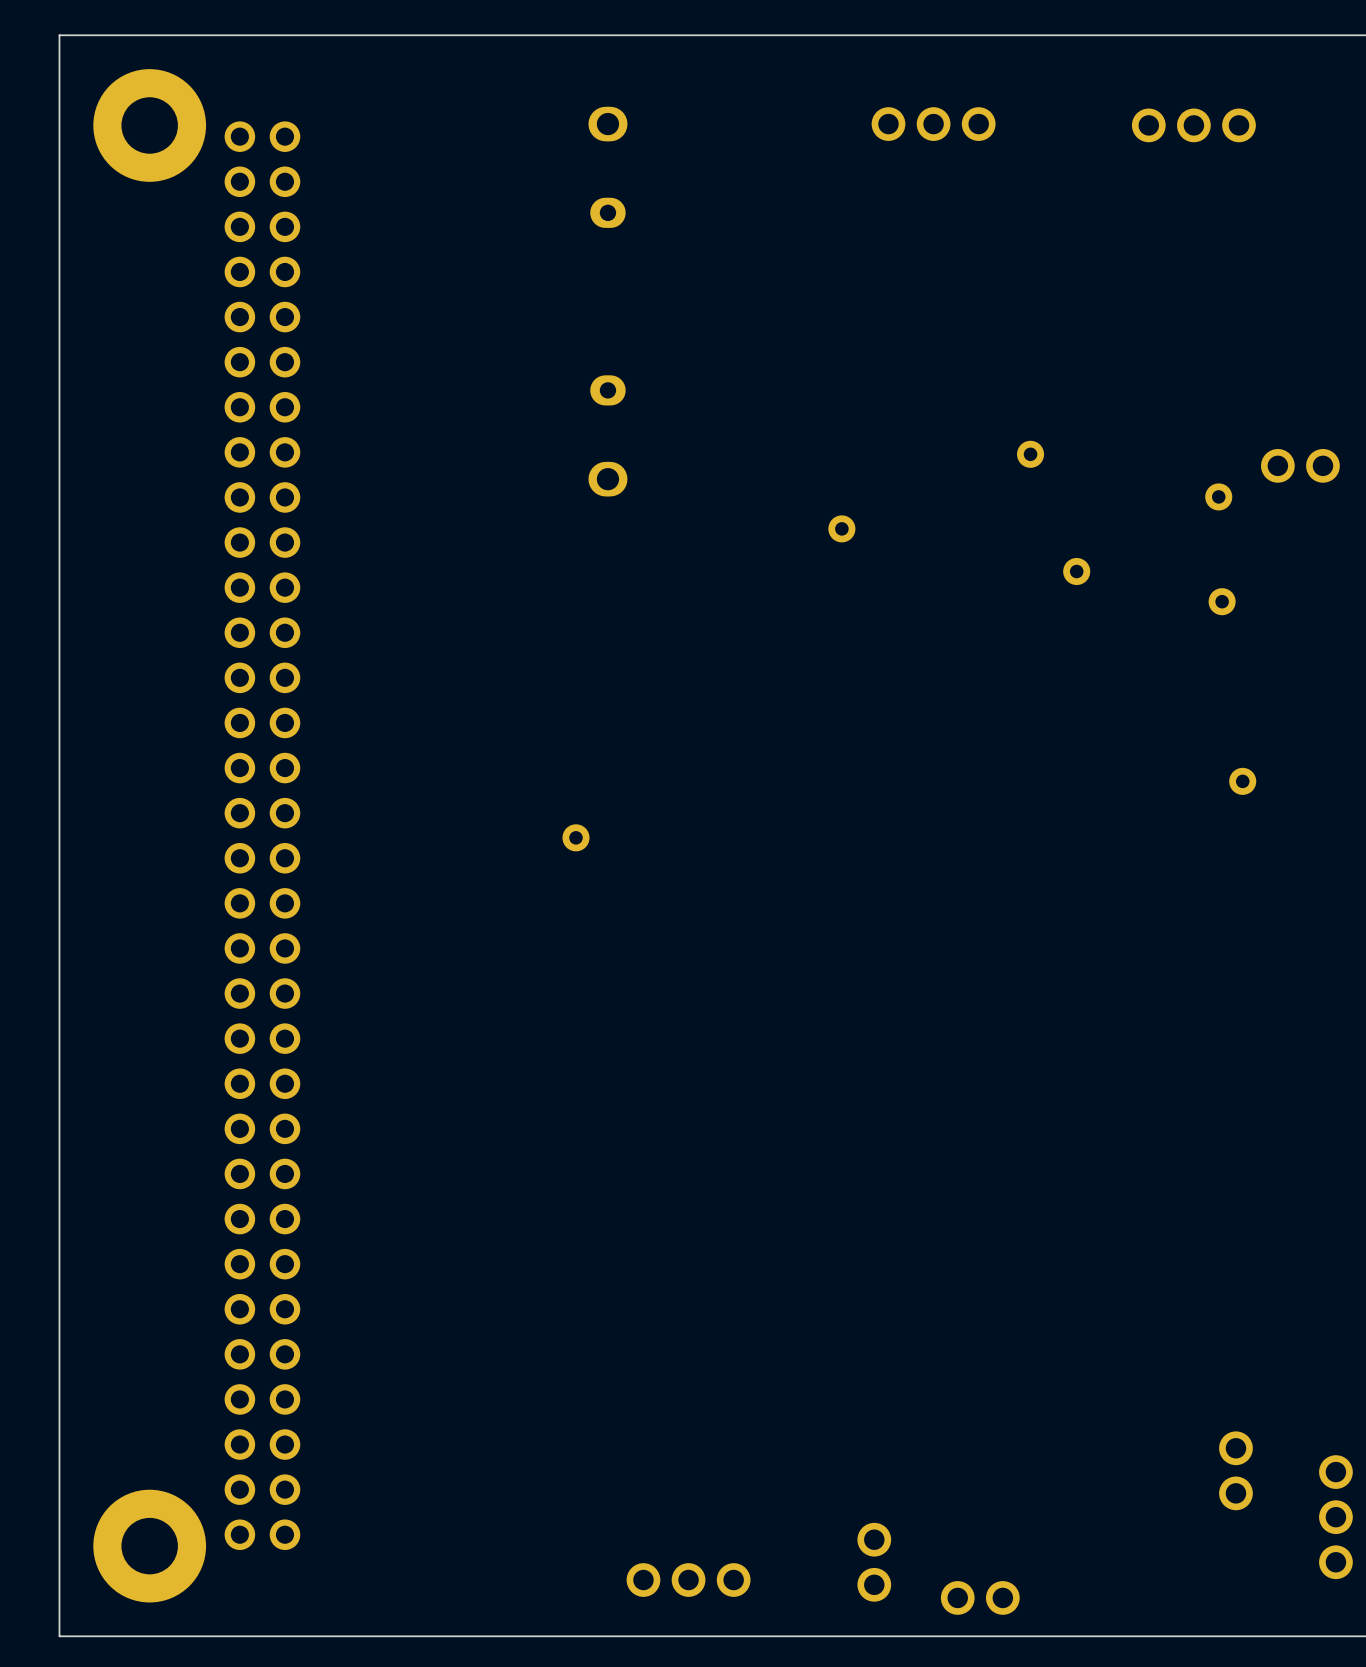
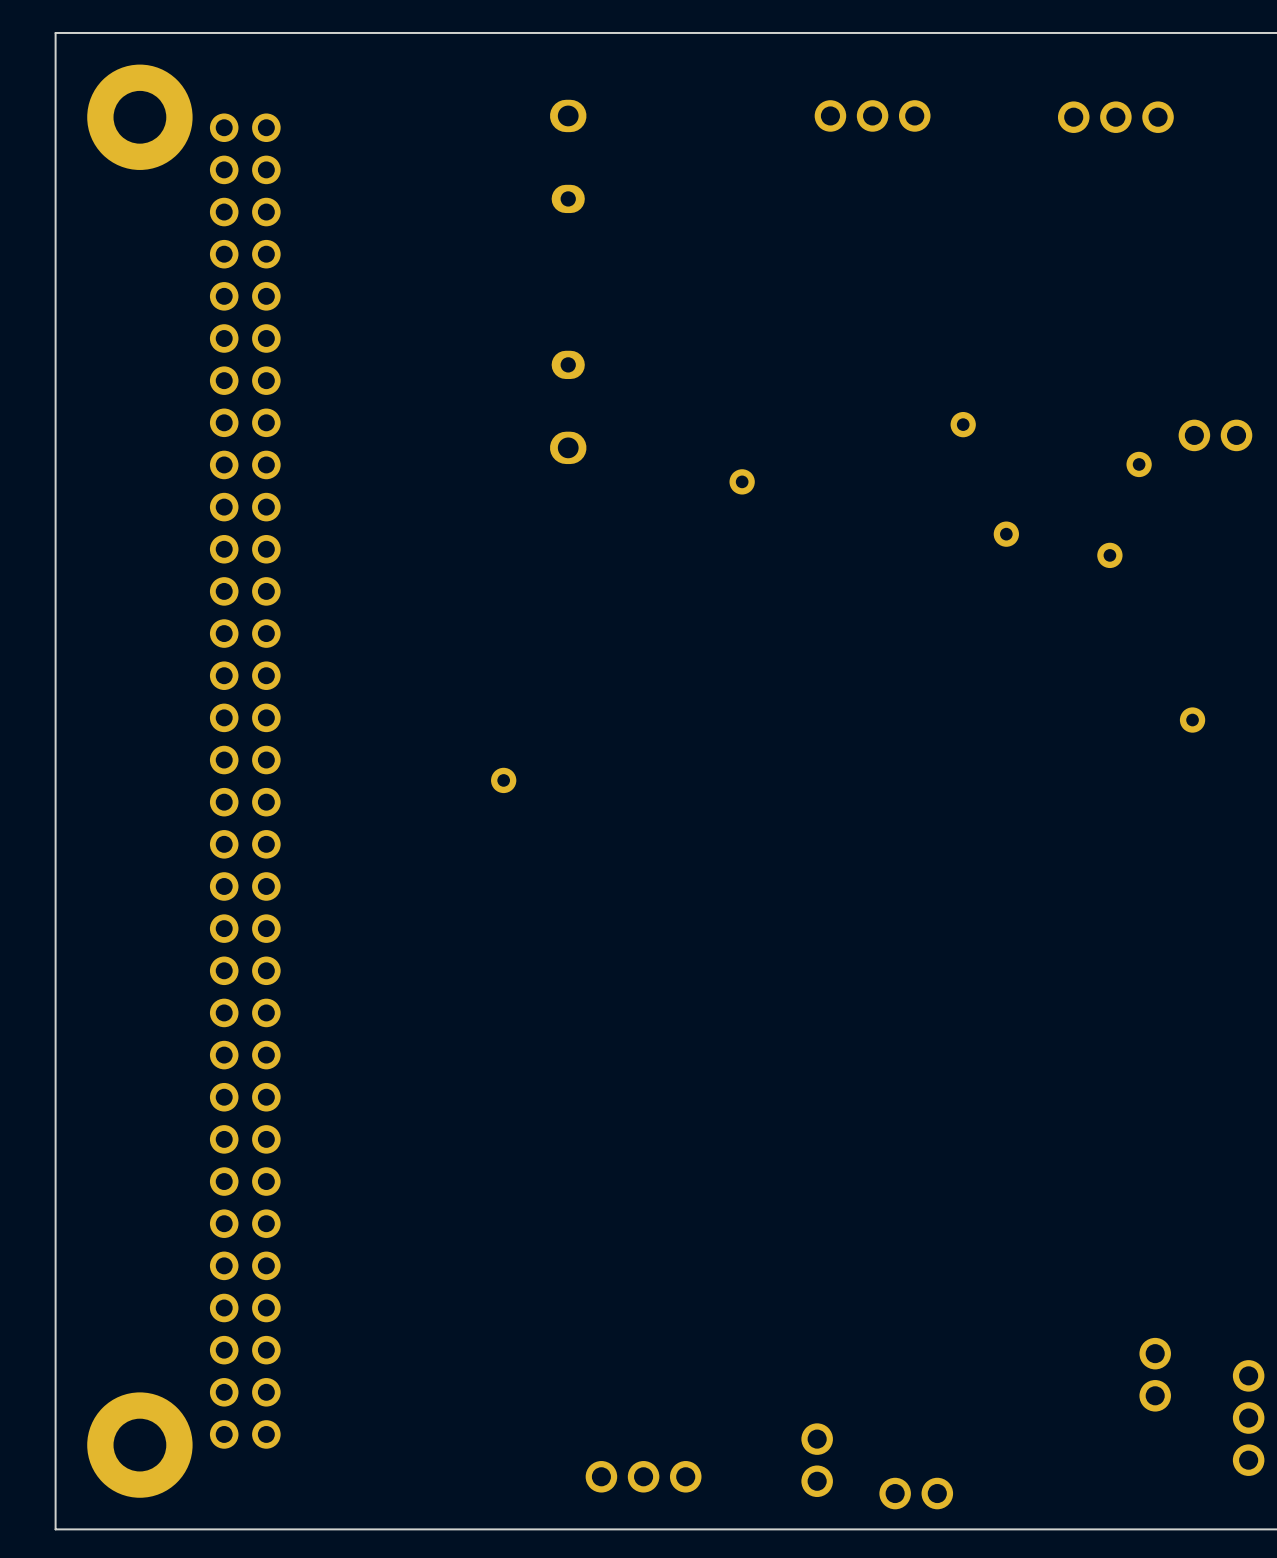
part position: (841, 528) -> (742, 481)
part position: (1222, 601) -> (1109, 555)
part position: (1242, 781) -> (1192, 720)
part position: (575, 837) -> (503, 780)

